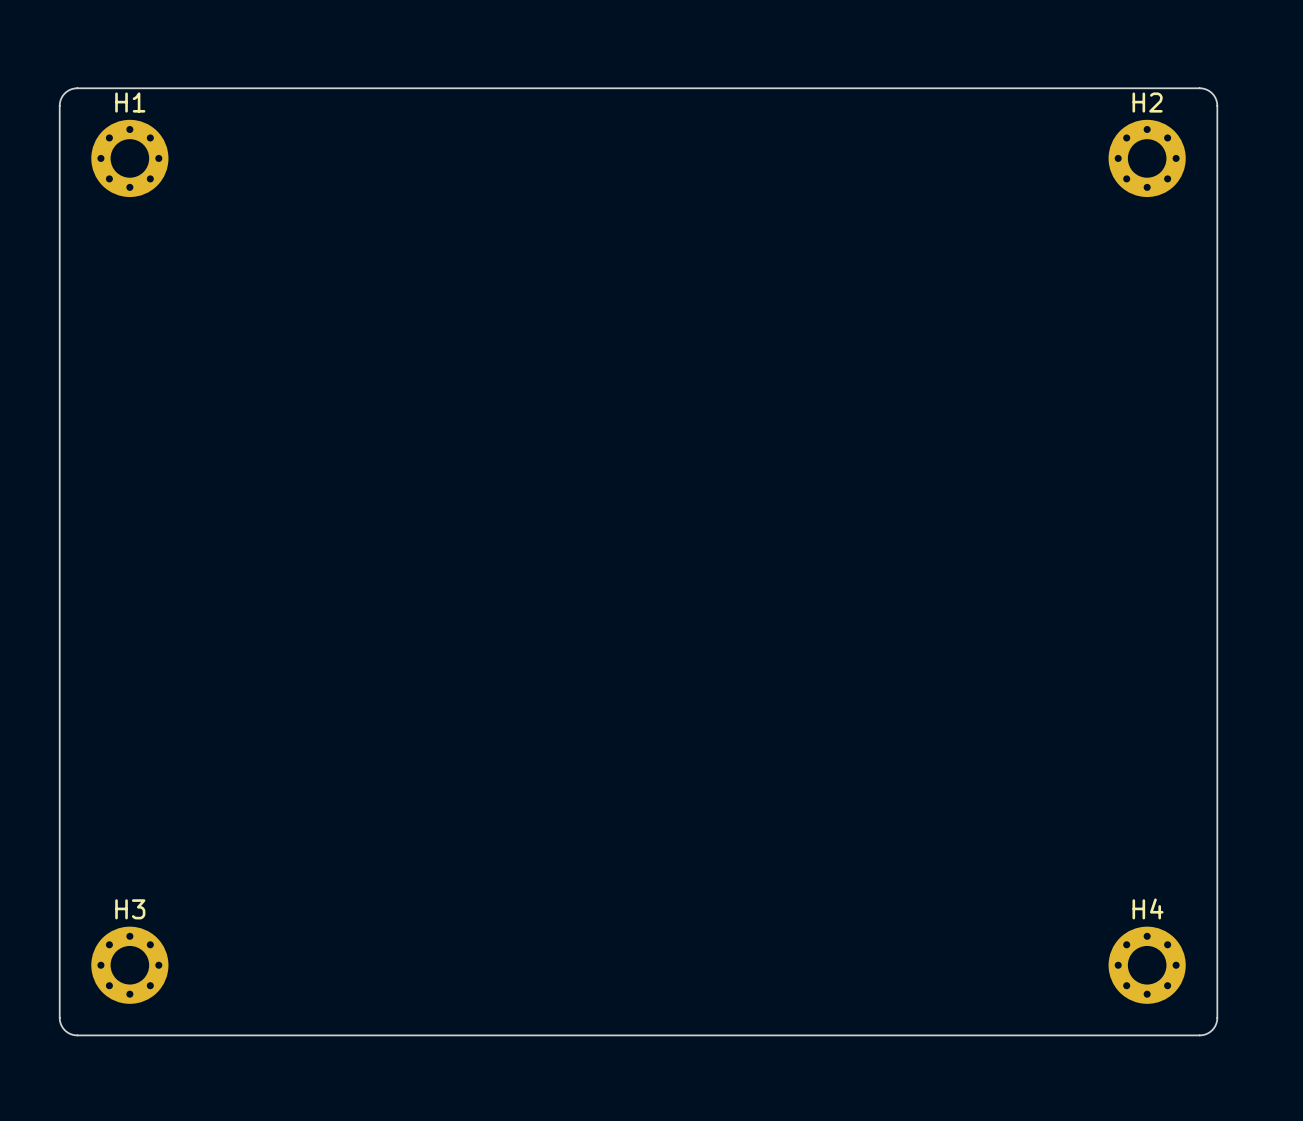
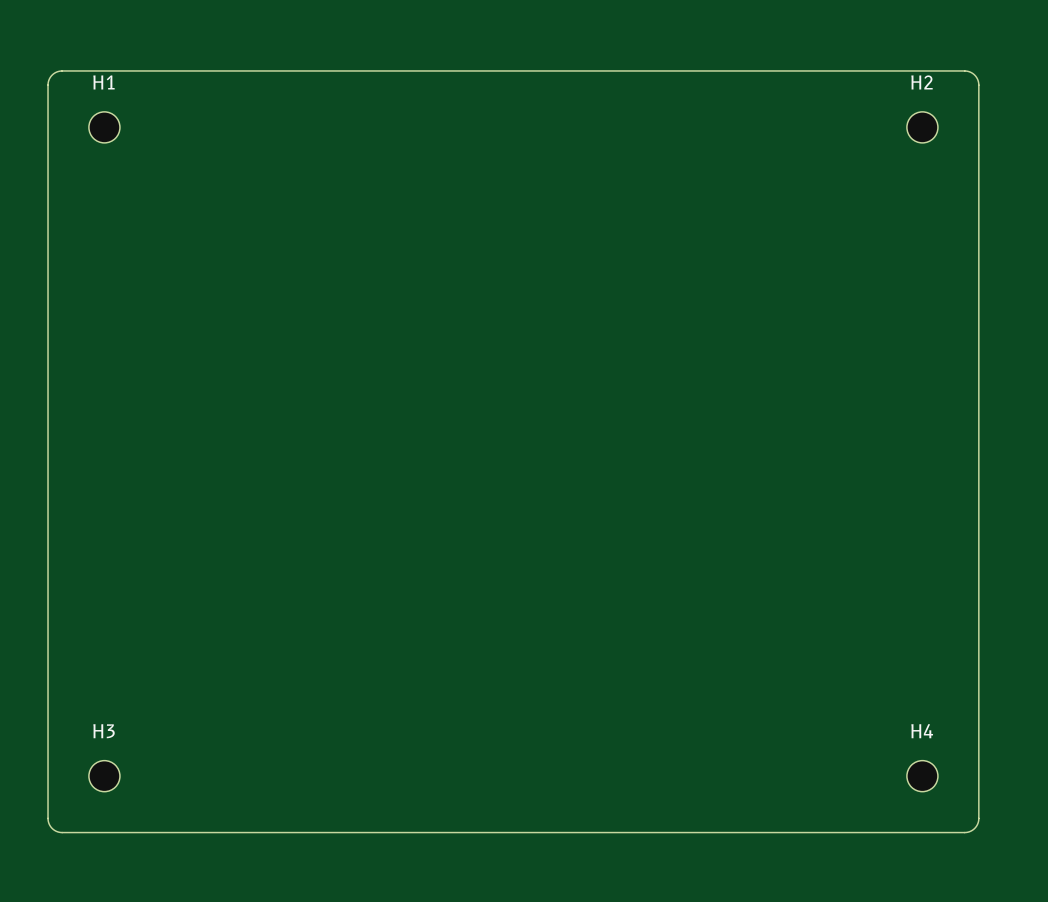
H1 footprint: [91, 119, 169, 198] -> [88, 111, 120, 143]
H2 footprint: [1108, 119, 1186, 198] -> [906, 111, 938, 143]
H3 footprint: [91, 926, 169, 1004] -> [88, 760, 120, 792]
H4 footprint: [1108, 926, 1186, 1004] -> [906, 760, 938, 792]

